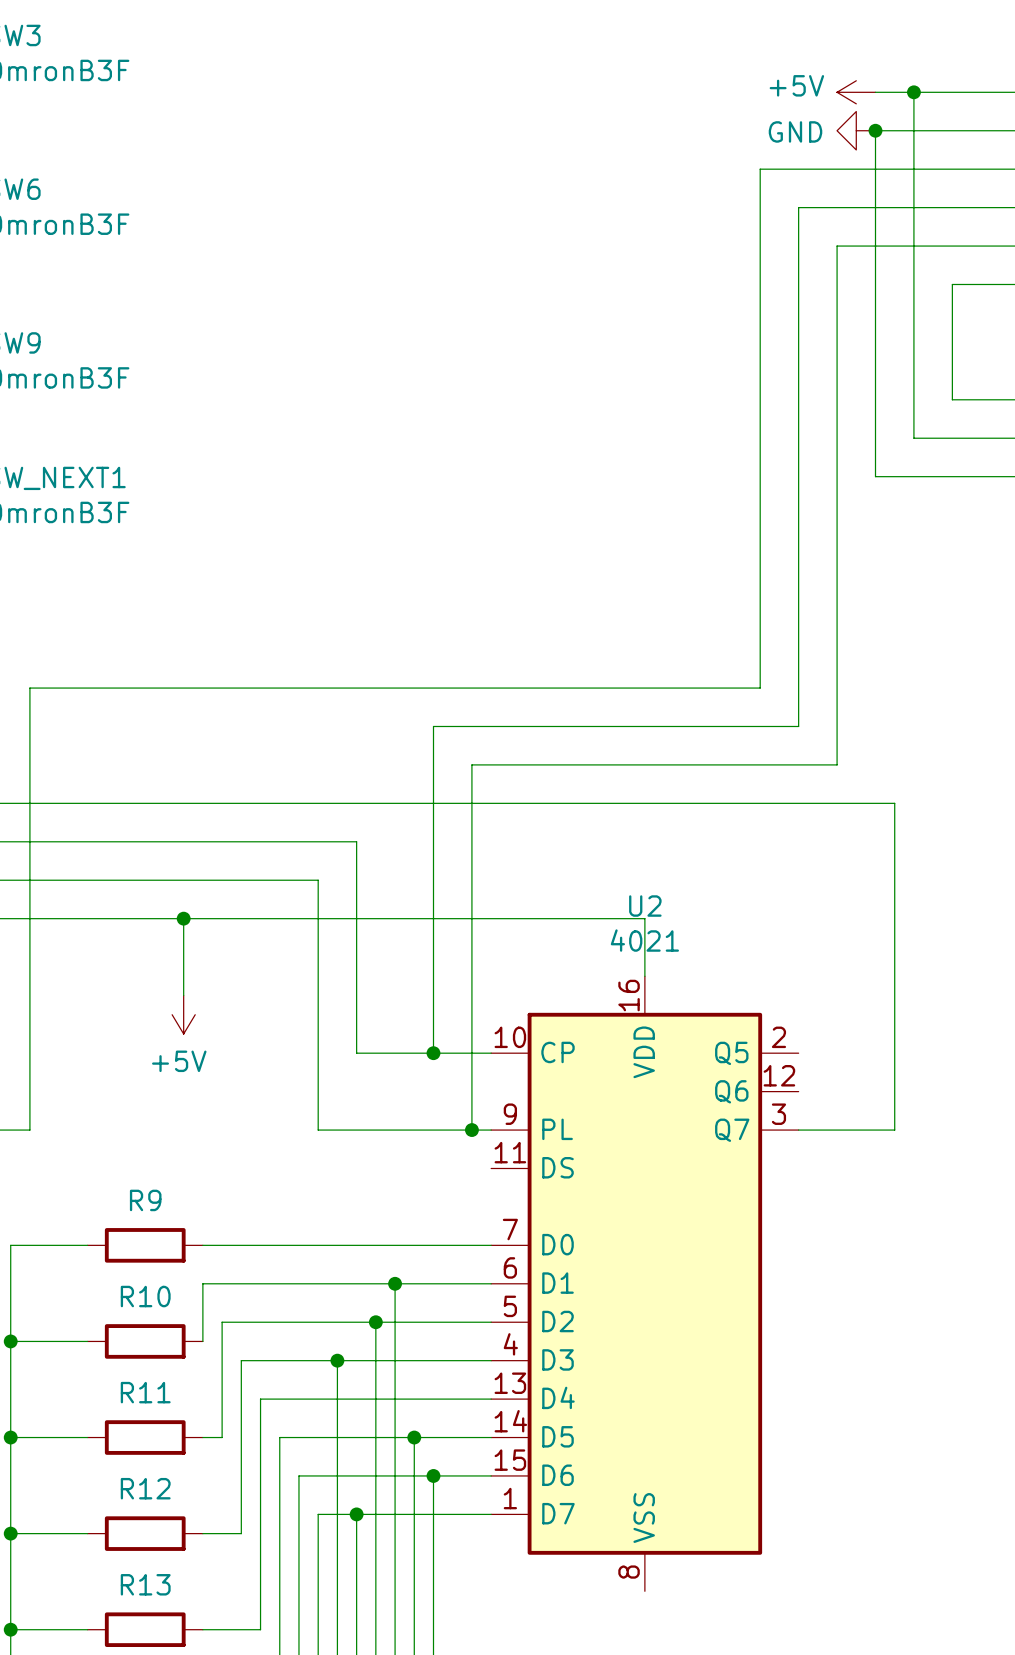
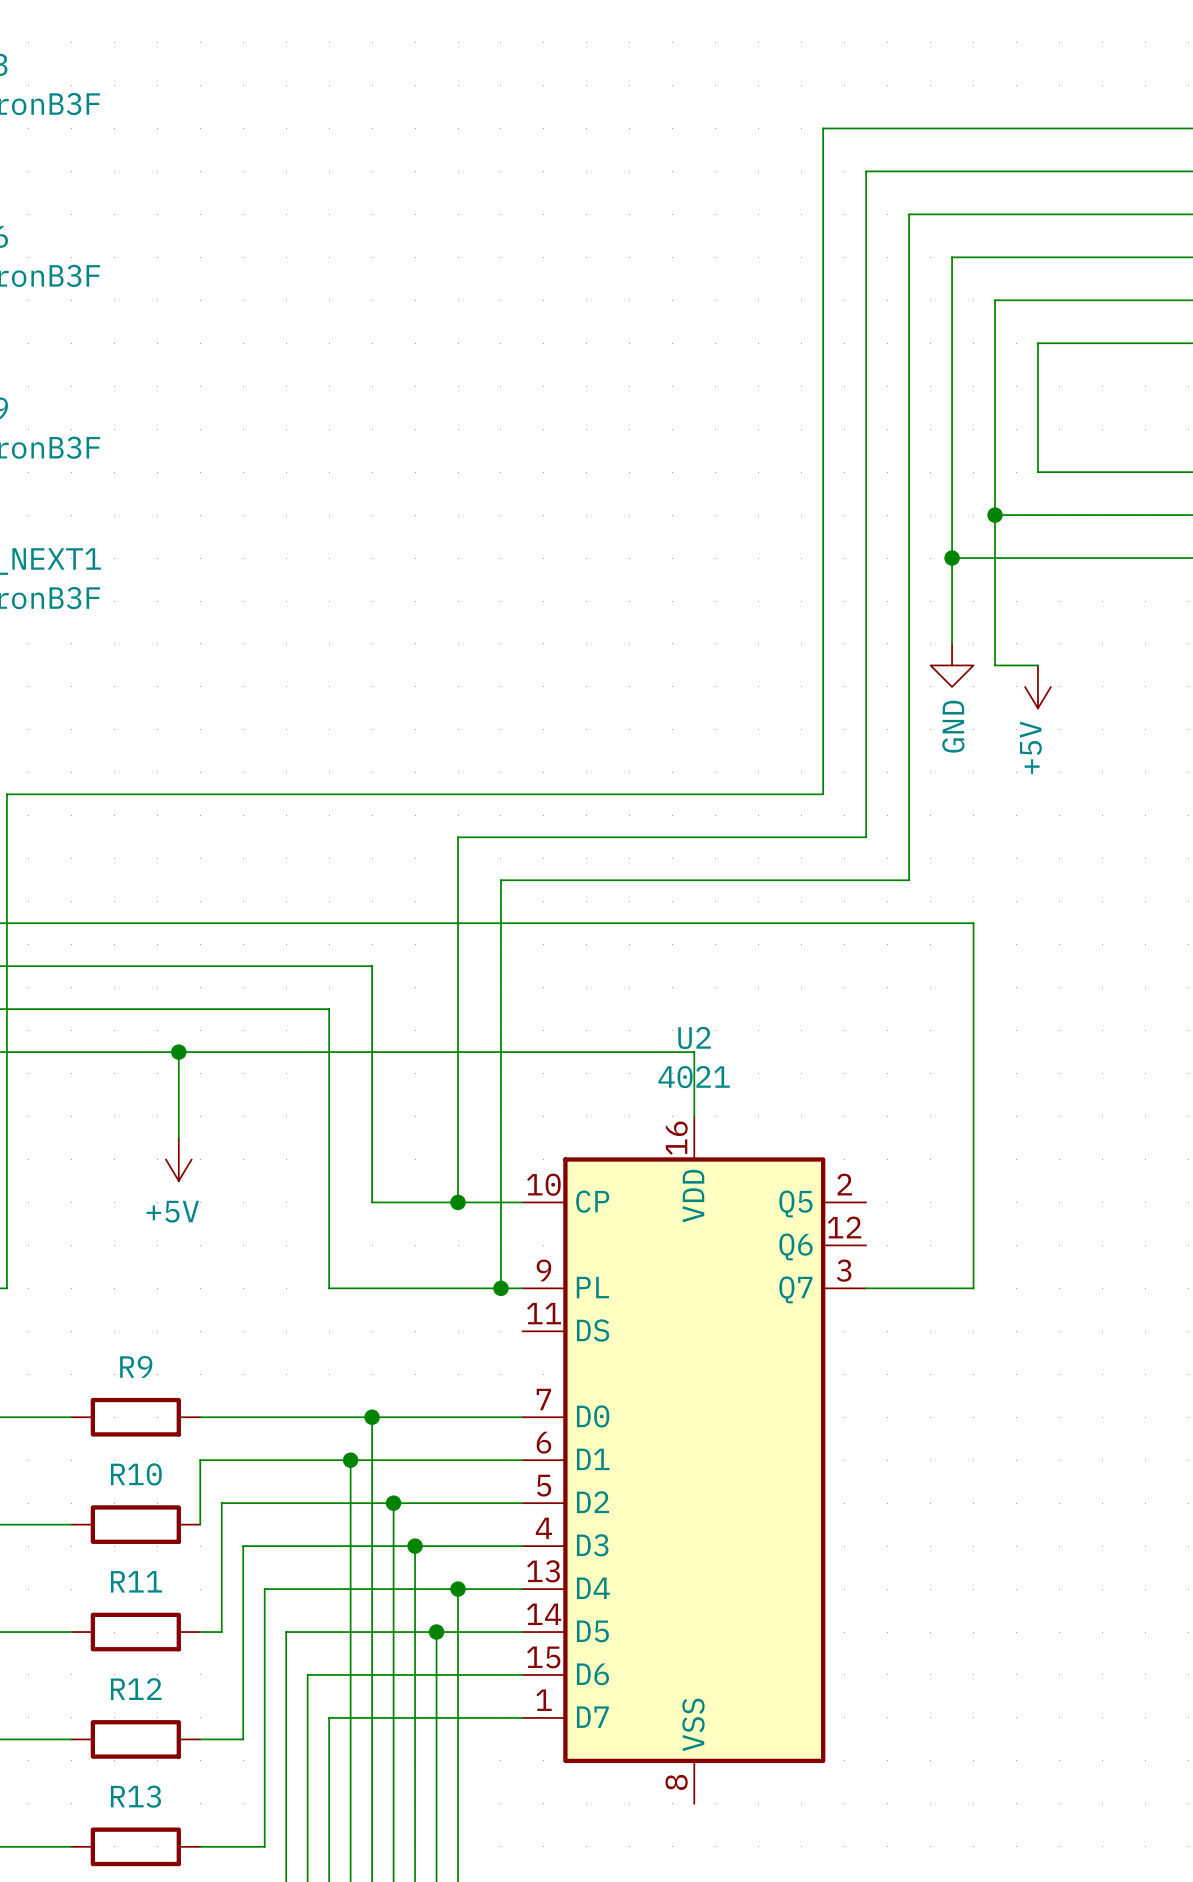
power symbol: +5V (856, 92) -> none
wire: (913, 92) (913, 246) (837, 246) -> (909, 214) (909, 300)
junction: (913, 92) -> none
power symbol: GND (856, 130) -> none
wire: (875, 130) (875, 207) (798, 207) -> (952, 171) (866, 171) (866, 257)
junction: (875, 130) -> none
wire: (760, 169) (837, 169) -> (823, 214) (823, 128) (952, 128)
wire: none -> (995, 515) (995, 665) (1037, 665)
junction: none -> (995, 515)
wire: none -> (952, 558) (952, 643)
junction: none -> (952, 558)
power symbol: none -> GND (952, 665)
power symbol: none -> +5V (1037, 686)
wire: none -> (372, 1417) (372, 1717)
junction: none -> (372, 1417)
junction: none -> (350, 1460)
wire: (395, 1283) (395, 1360) -> (350, 1460) (350, 1546)
junction: (395, 1283) -> none
junction: (337, 1360) -> none
junction: none -> (415, 1546)
wire: none -> (458, 1589) (458, 1674)
junction: none -> (458, 1589)
junction: (433, 1475) -> none
junction: (356, 1514) -> none

